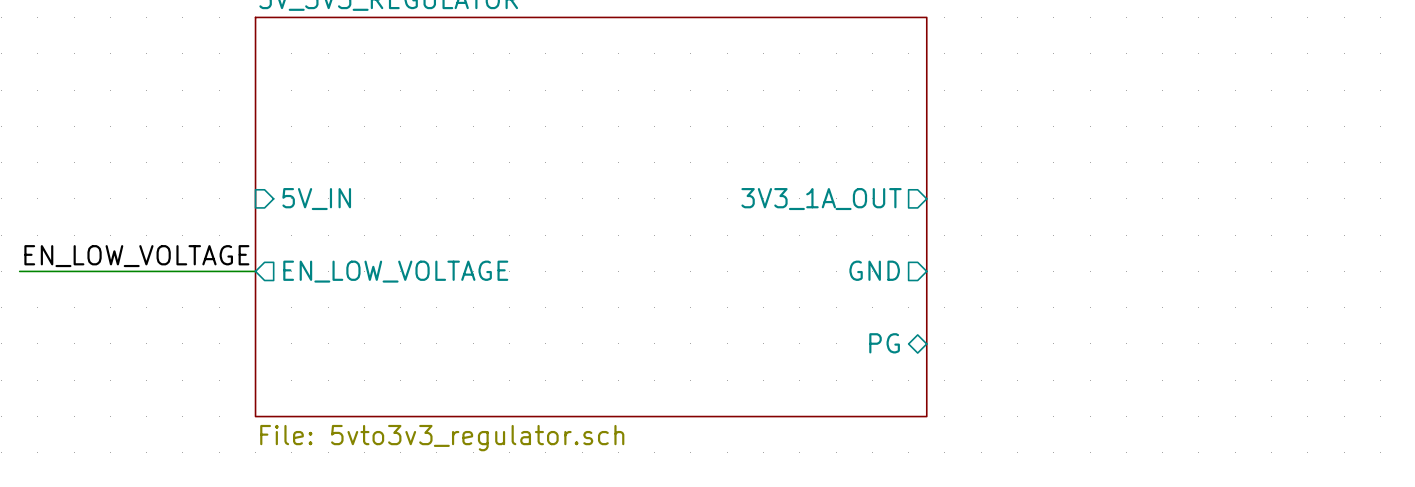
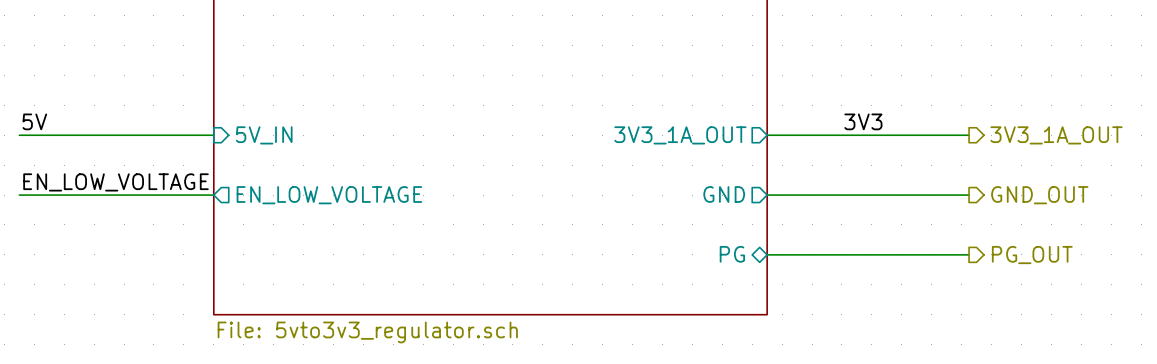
label: none -> 5V (34, 121)
label: none -> 3V3 (863, 121)
wire: none -> (19, 135) (213, 135)
wire: none -> (767, 135) (969, 135)
hierarchical label: none -> 3V3_1A_OUT (1056, 135)
wire: none -> (767, 195) (969, 195)
hierarchical label: none -> GND_OUT (1039, 195)
wire: none -> (767, 254) (969, 254)
hierarchical label: none -> PG_OUT (1032, 255)

